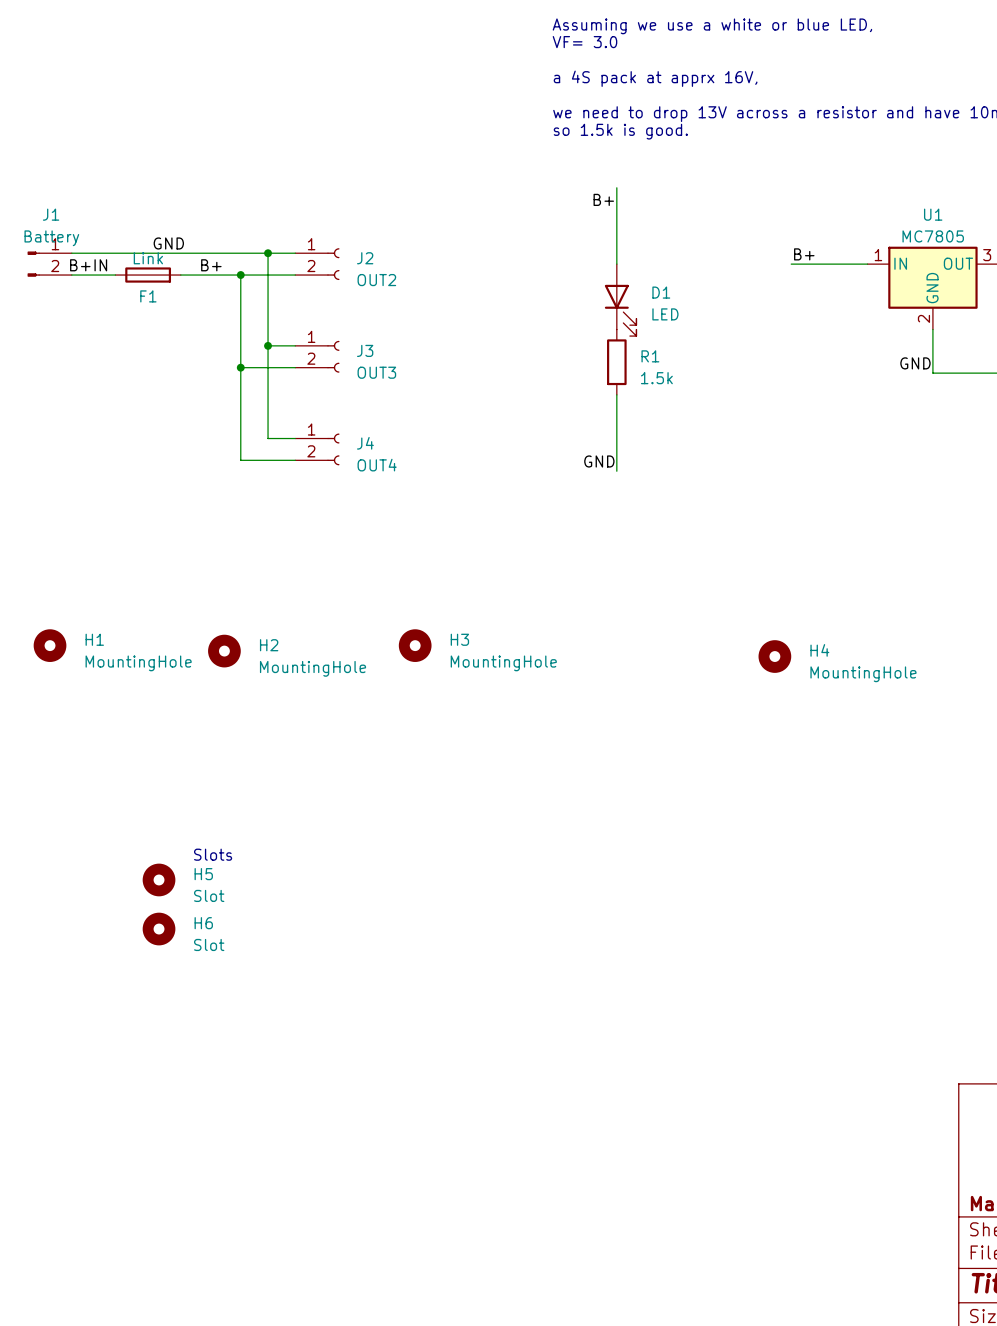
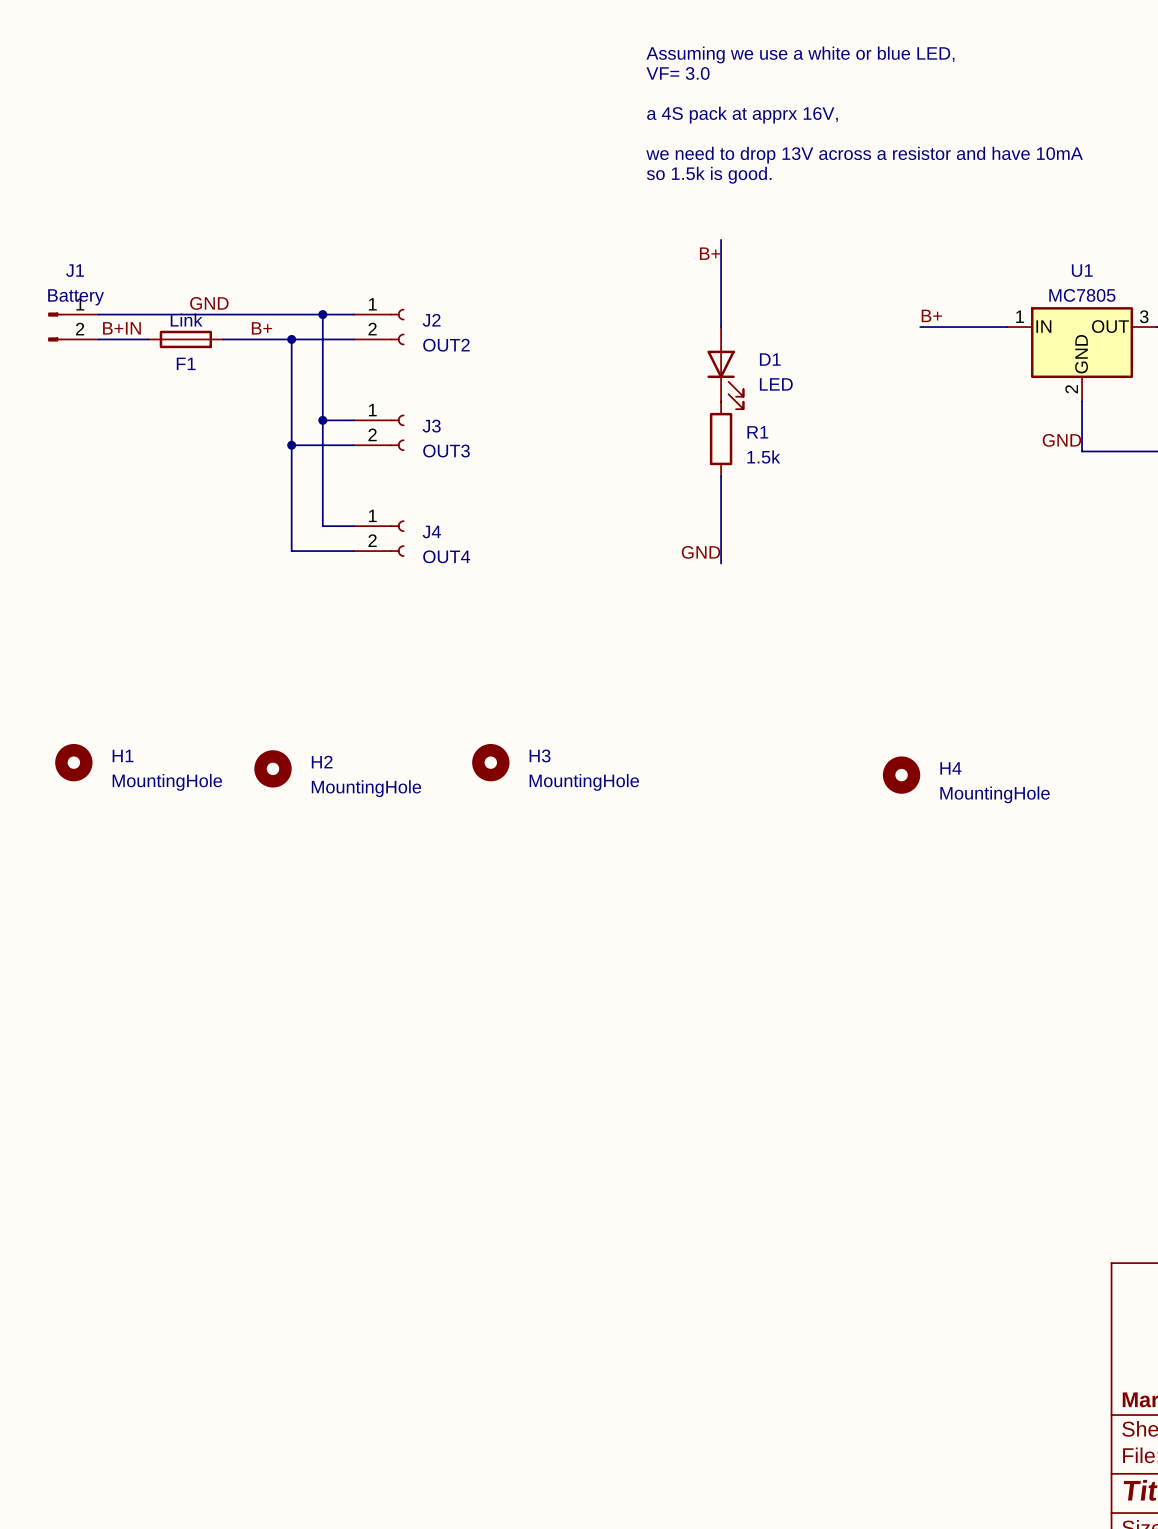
text: Slots (213, 854) -> none
H5: Slot (159, 879) -> none
H6: Slot (159, 929) -> none

